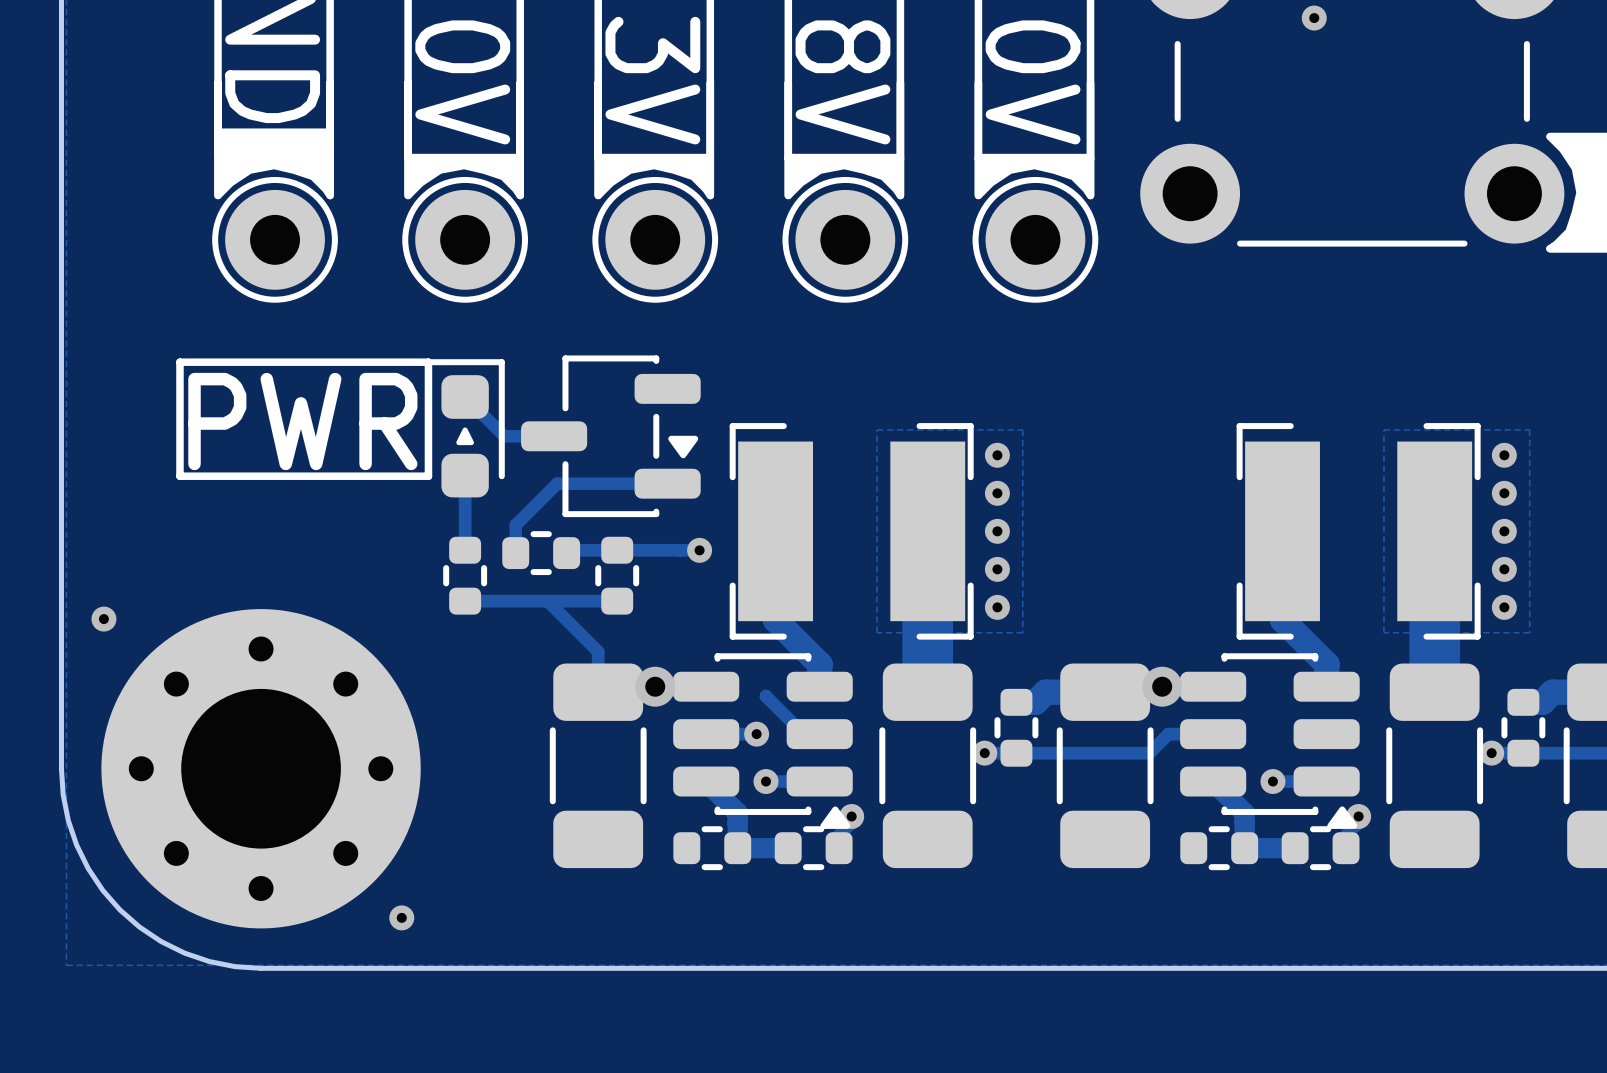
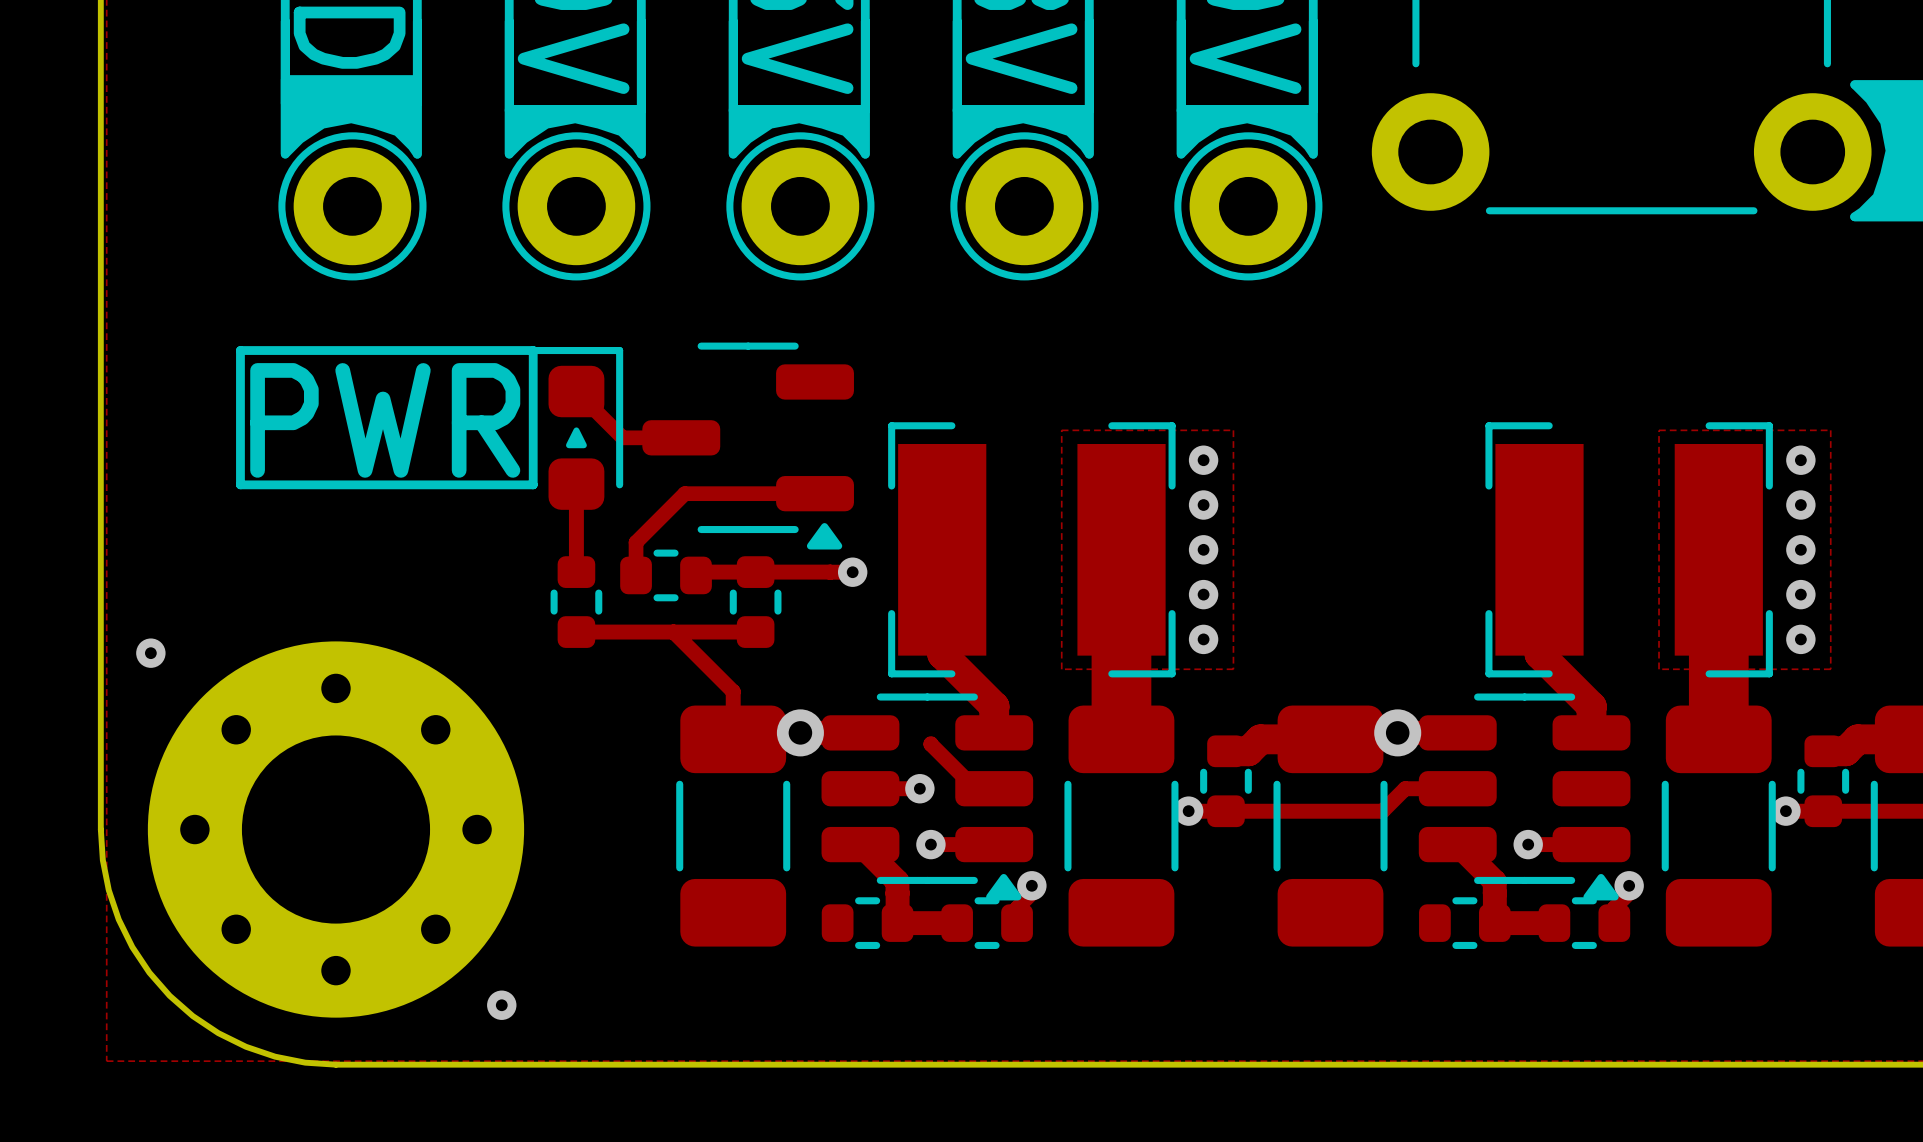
part footprint: [521, 355, 701, 518] -> [642, 342, 854, 550]
part footprint: [673, 653, 853, 829] -> [821, 693, 1034, 901]
part footprint: [1180, 653, 1360, 829] -> [1418, 693, 1631, 901]

